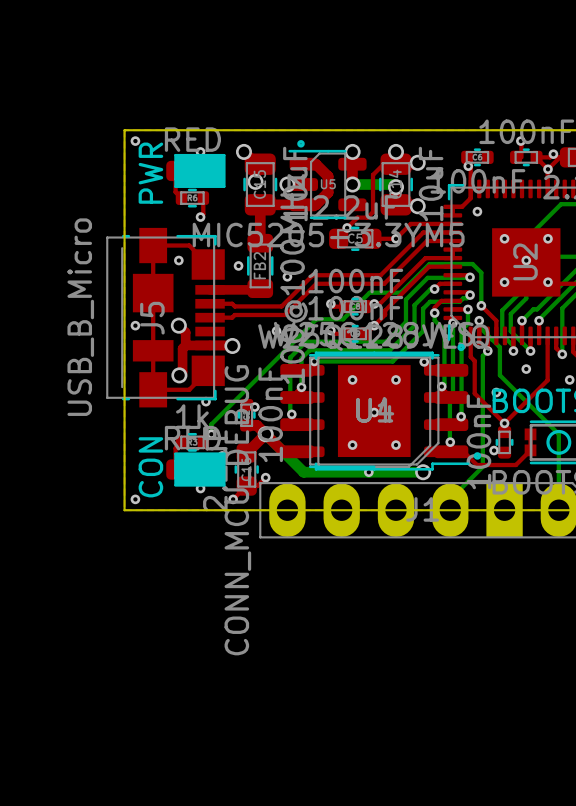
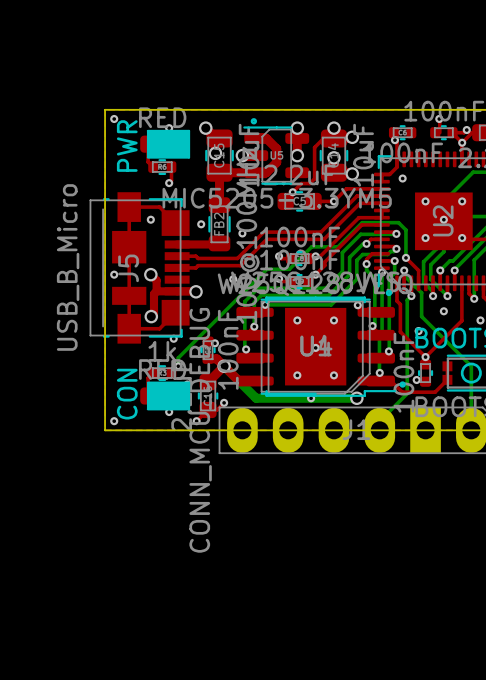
bottom track: (352, 184) (393, 184) (395, 187) -> none

